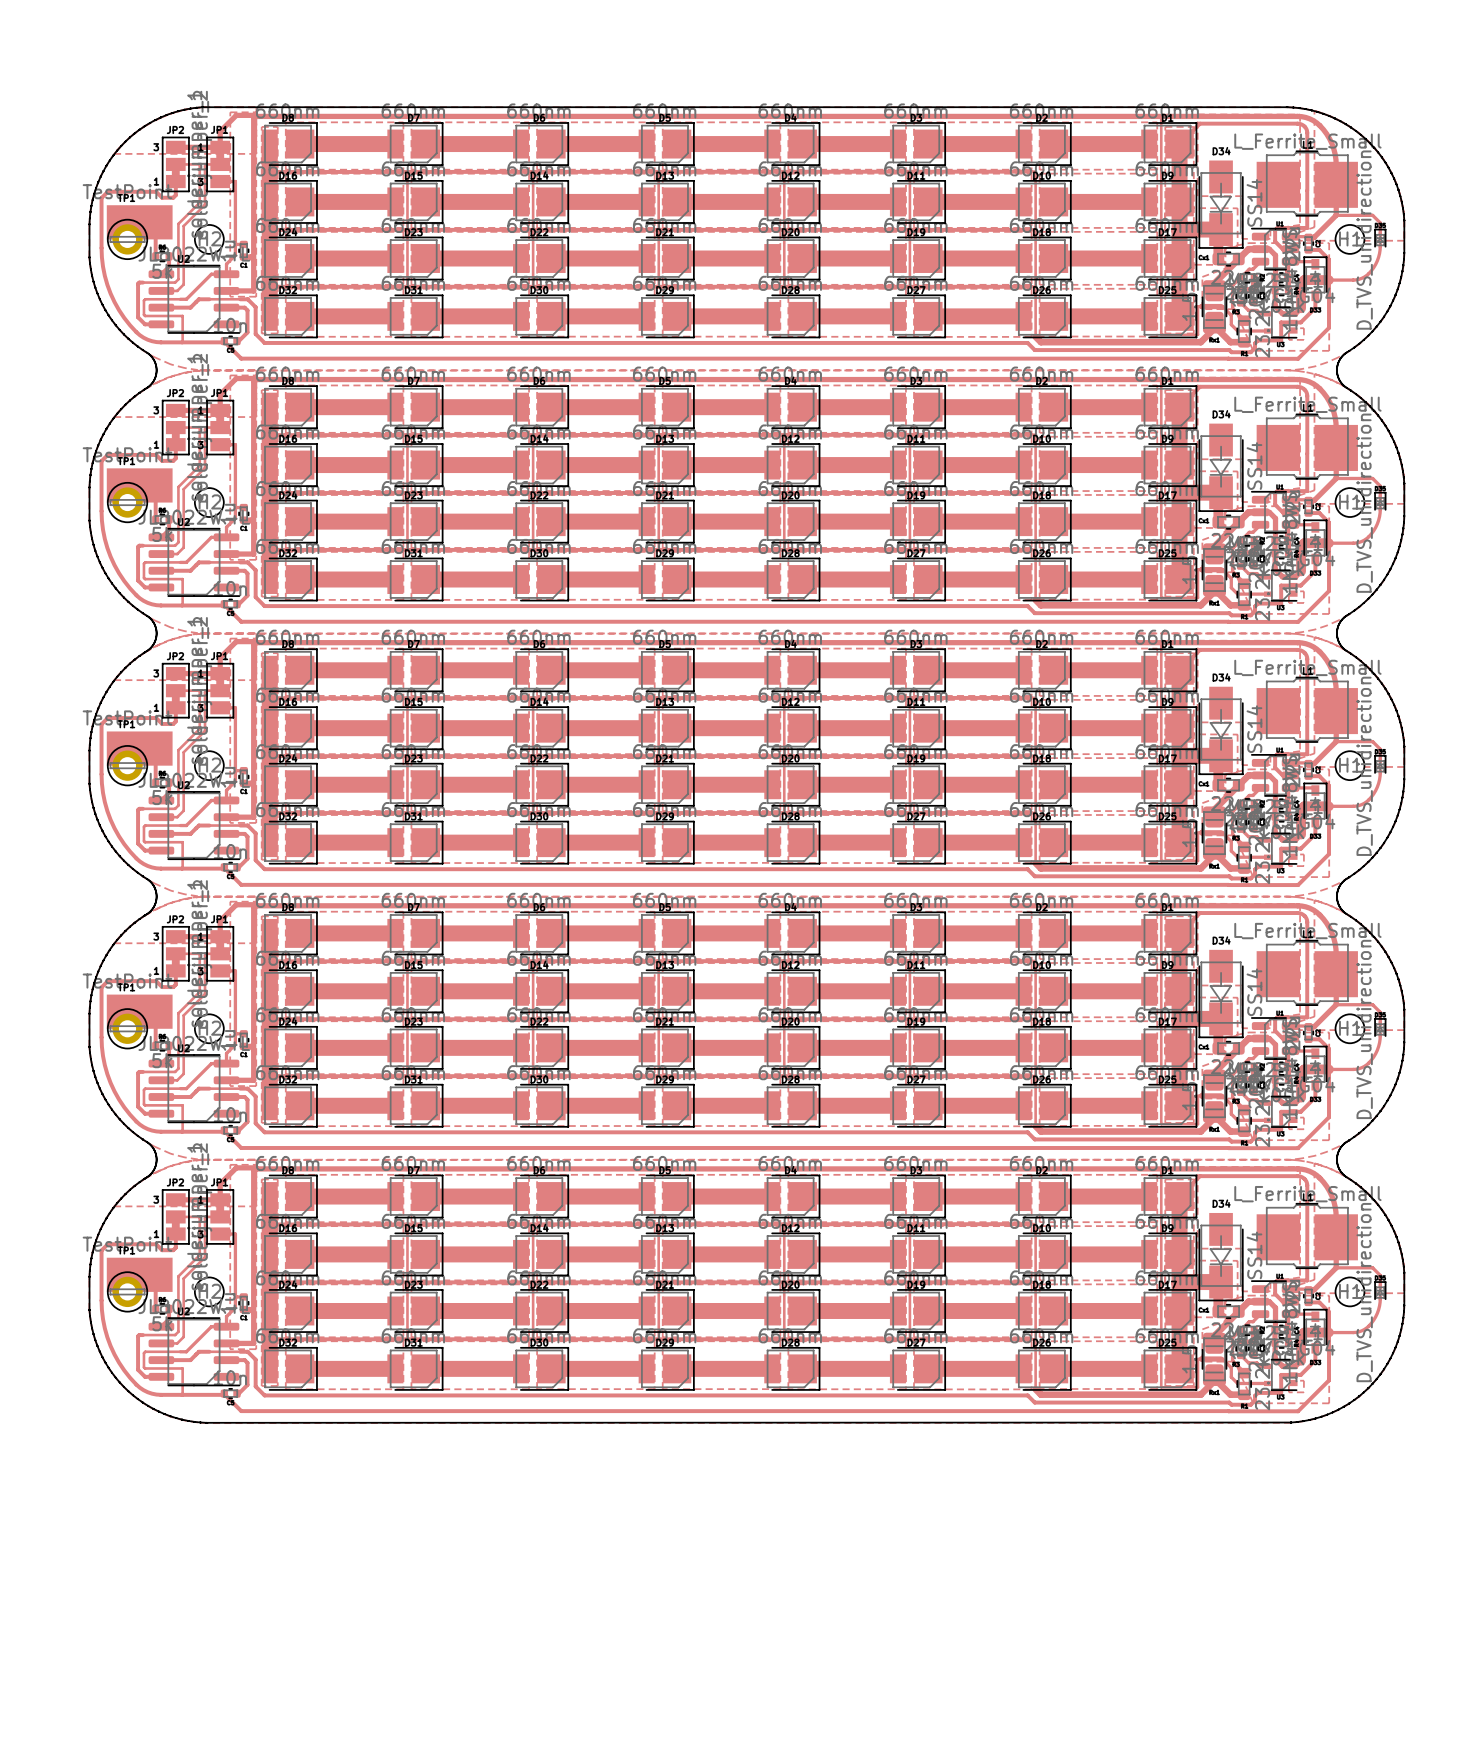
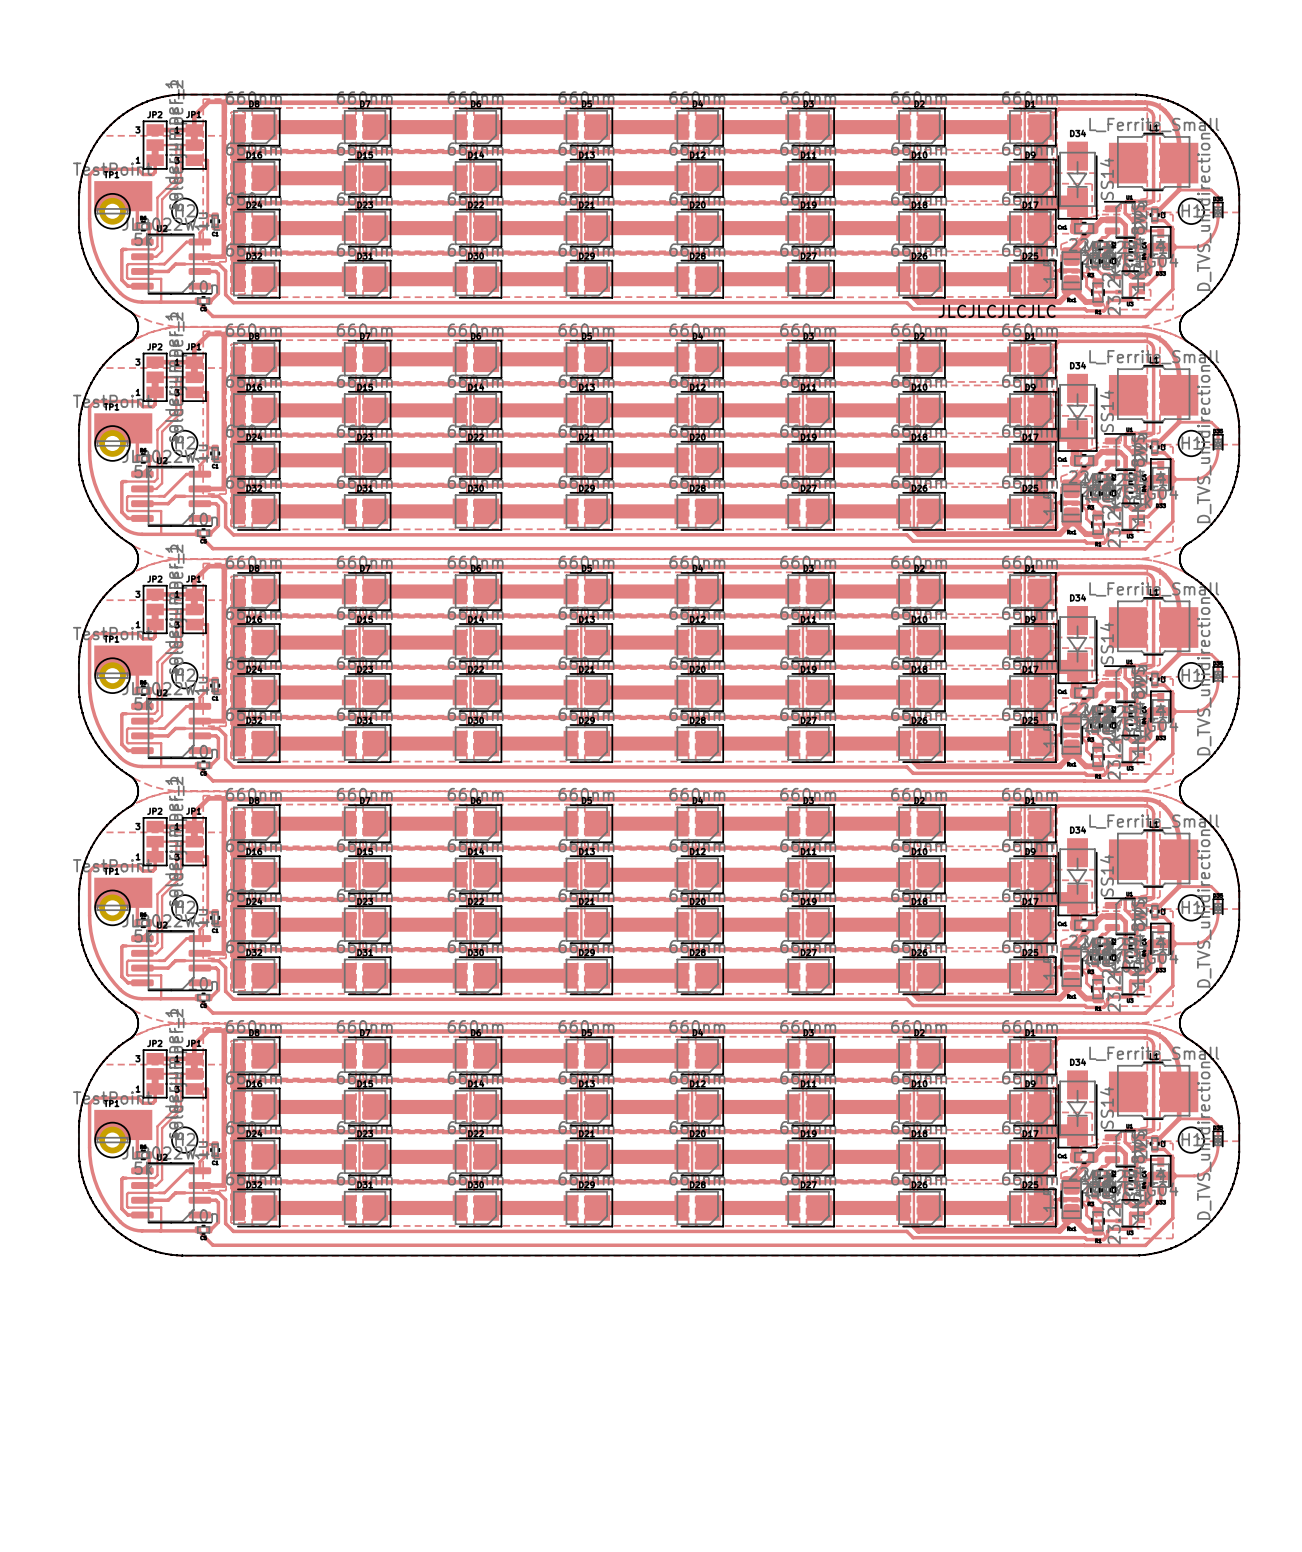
text: none -> JLCJLCJLCJLC (997, 311)

